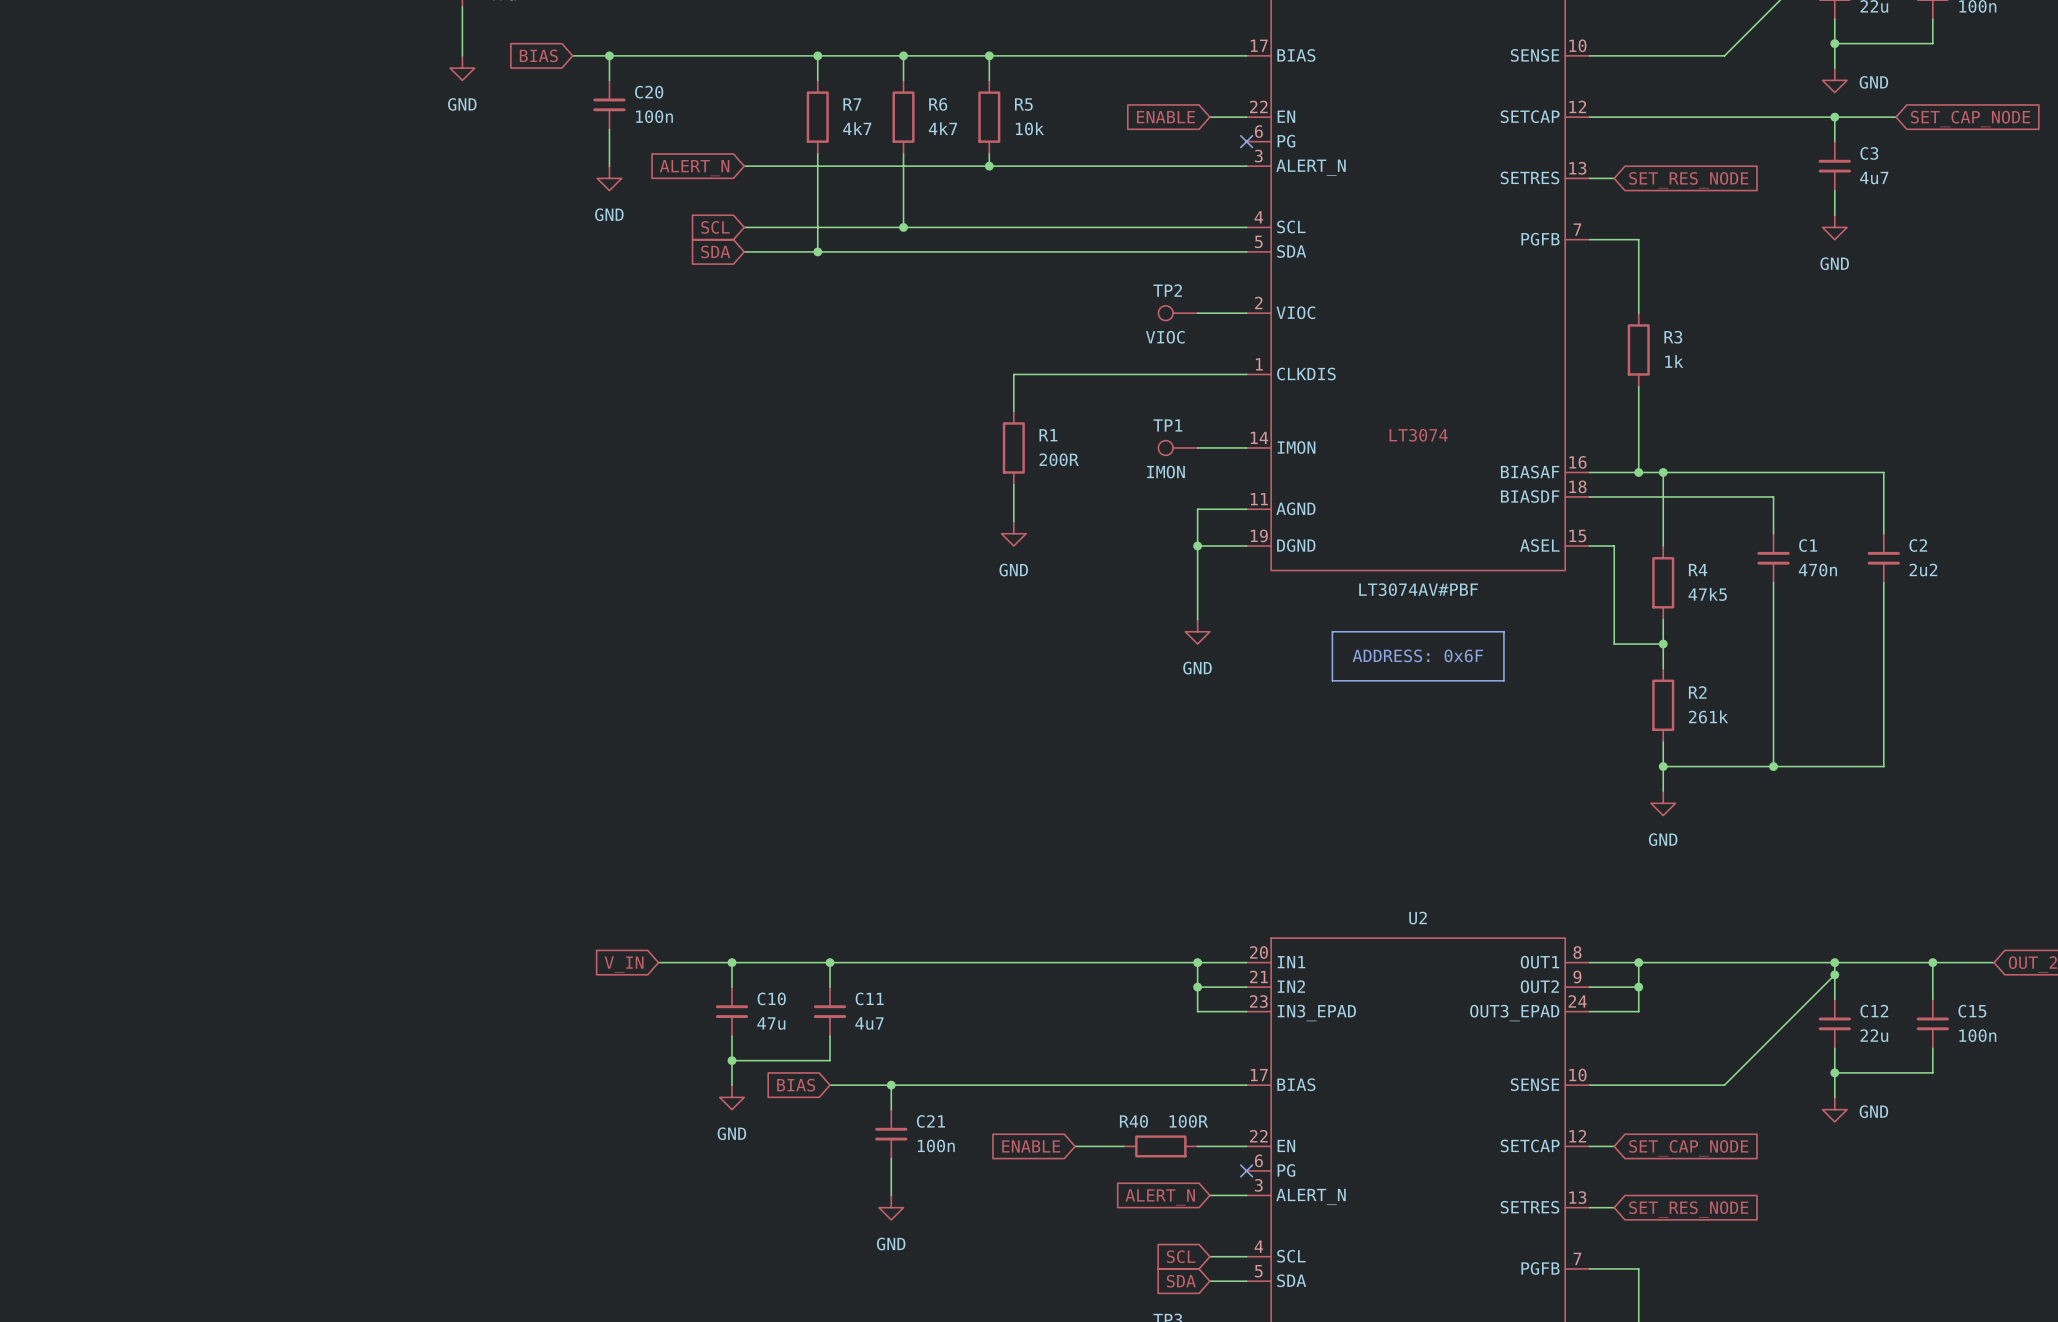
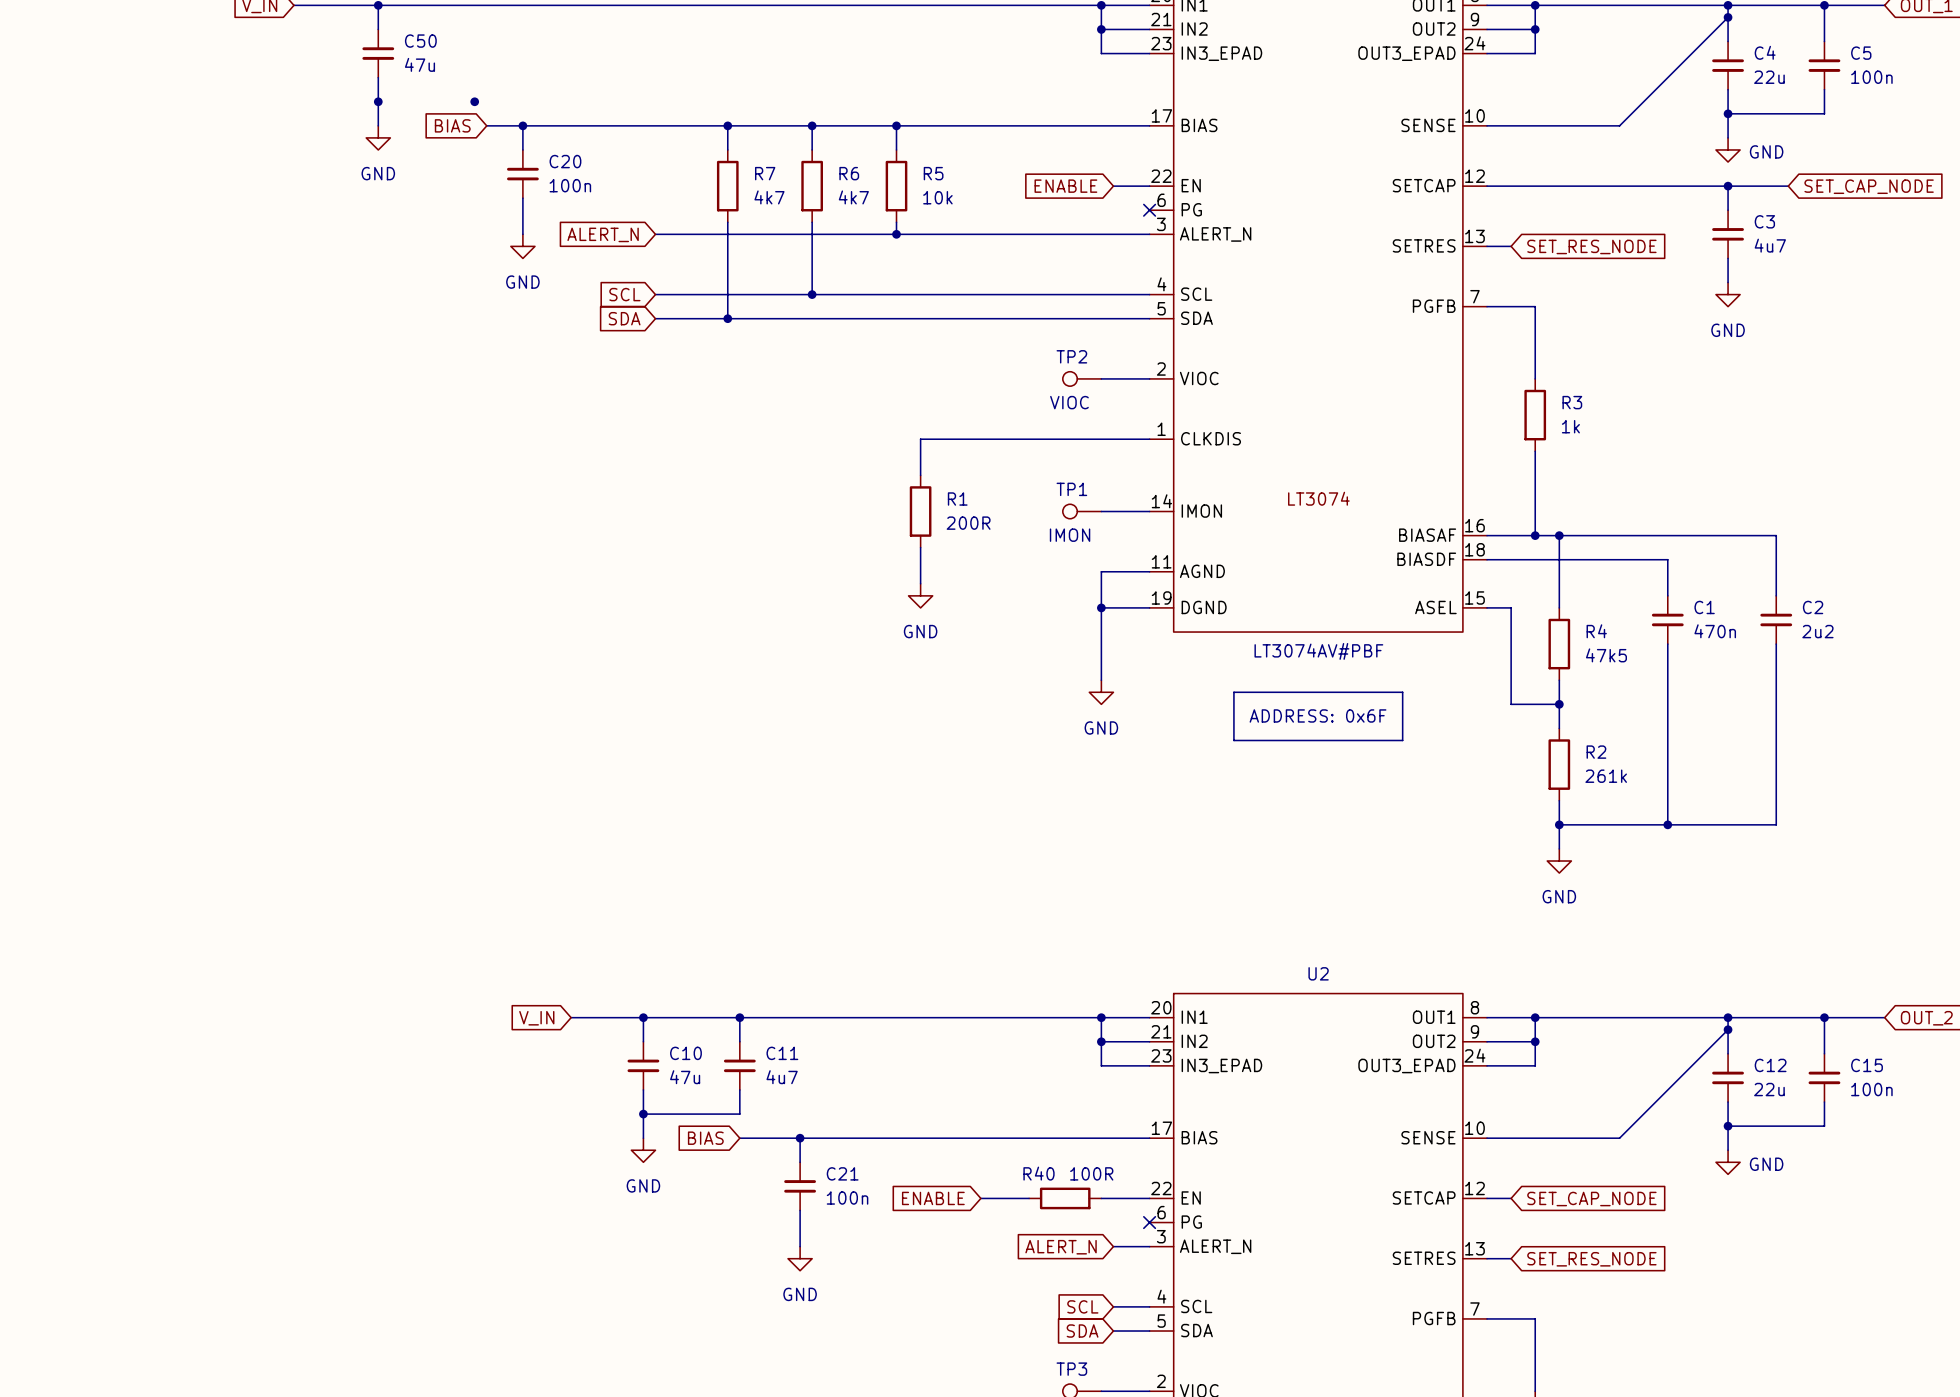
junction: none -> (378, 101)
junction: none -> (474, 101)

